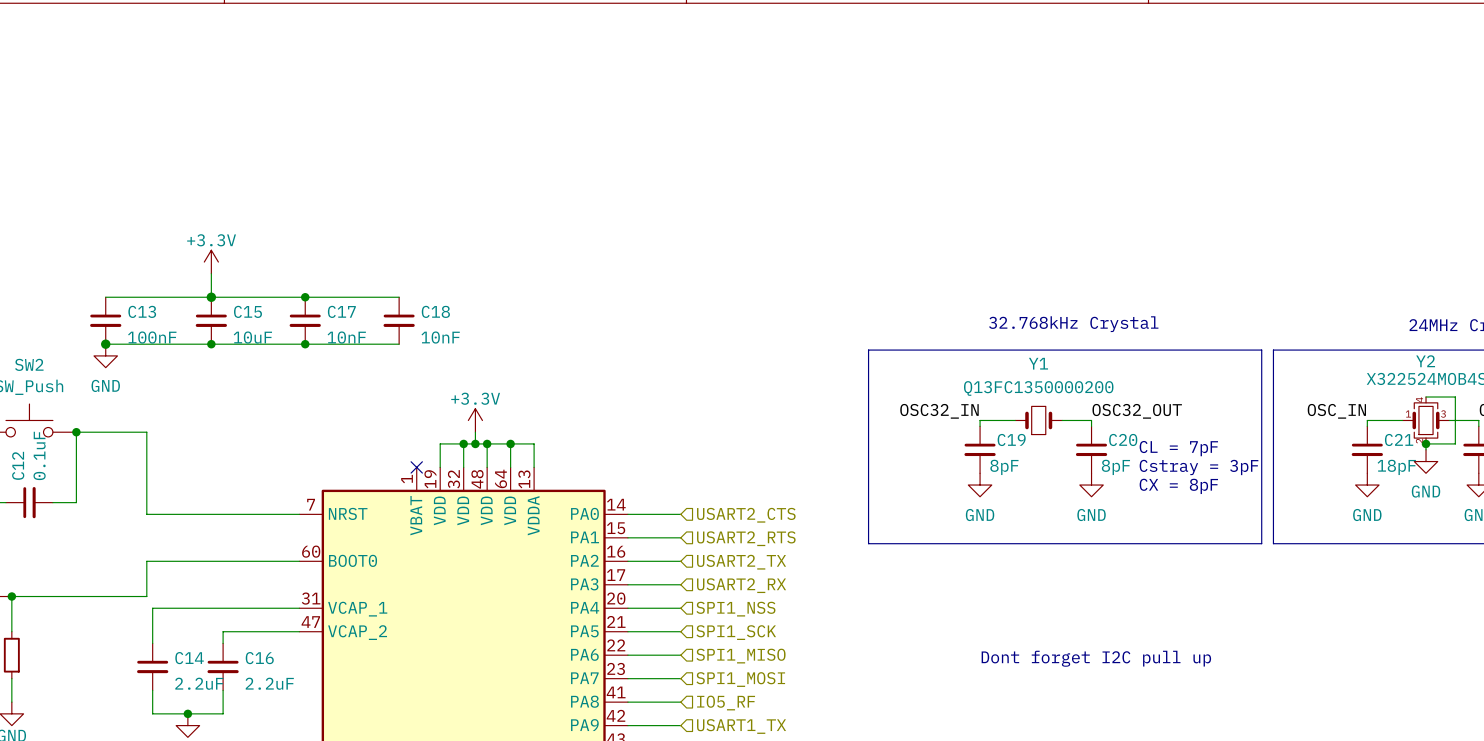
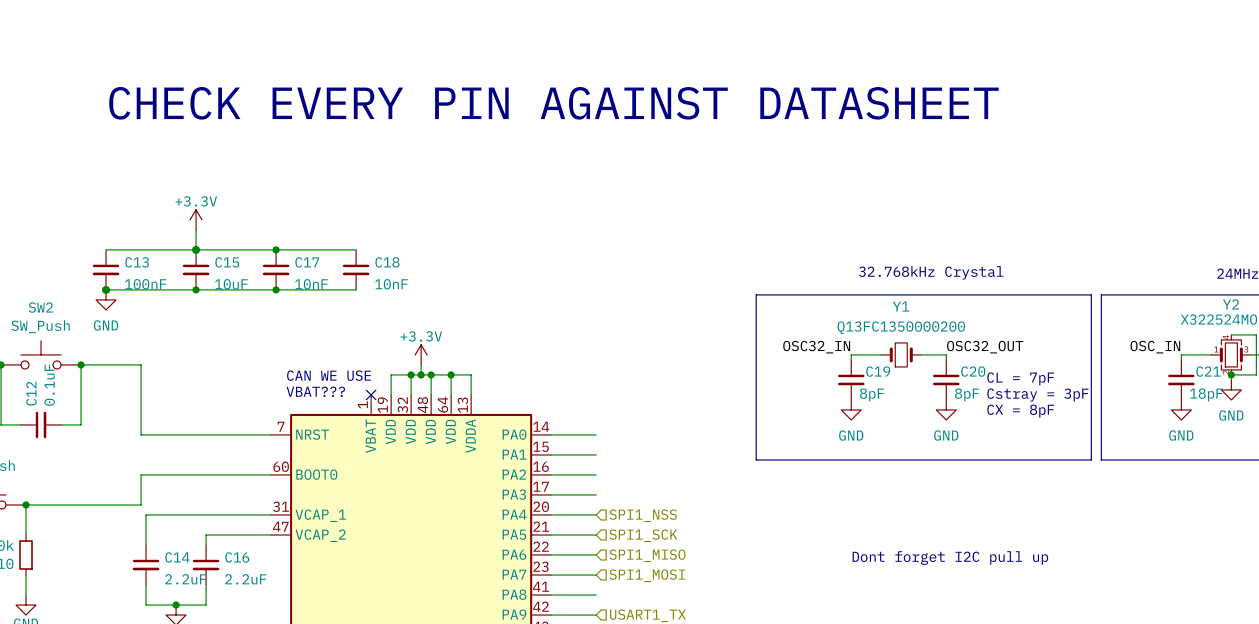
text: none -> CHECK EVERY PIN AGAINST DATASHEET (553, 103)
text: none -> CAN WE USE (329, 375)
text: none -> VBAT??? (315, 391)
hierarchical label: USART2_CTS (746, 515) -> none
hierarchical label: USART2_RTS (746, 538) -> none
hierarchical label: USART2_TX (741, 562) -> none
hierarchical label: USART2_RX (741, 585) -> none
hierarchical label: IO5_RF (726, 703) -> none

